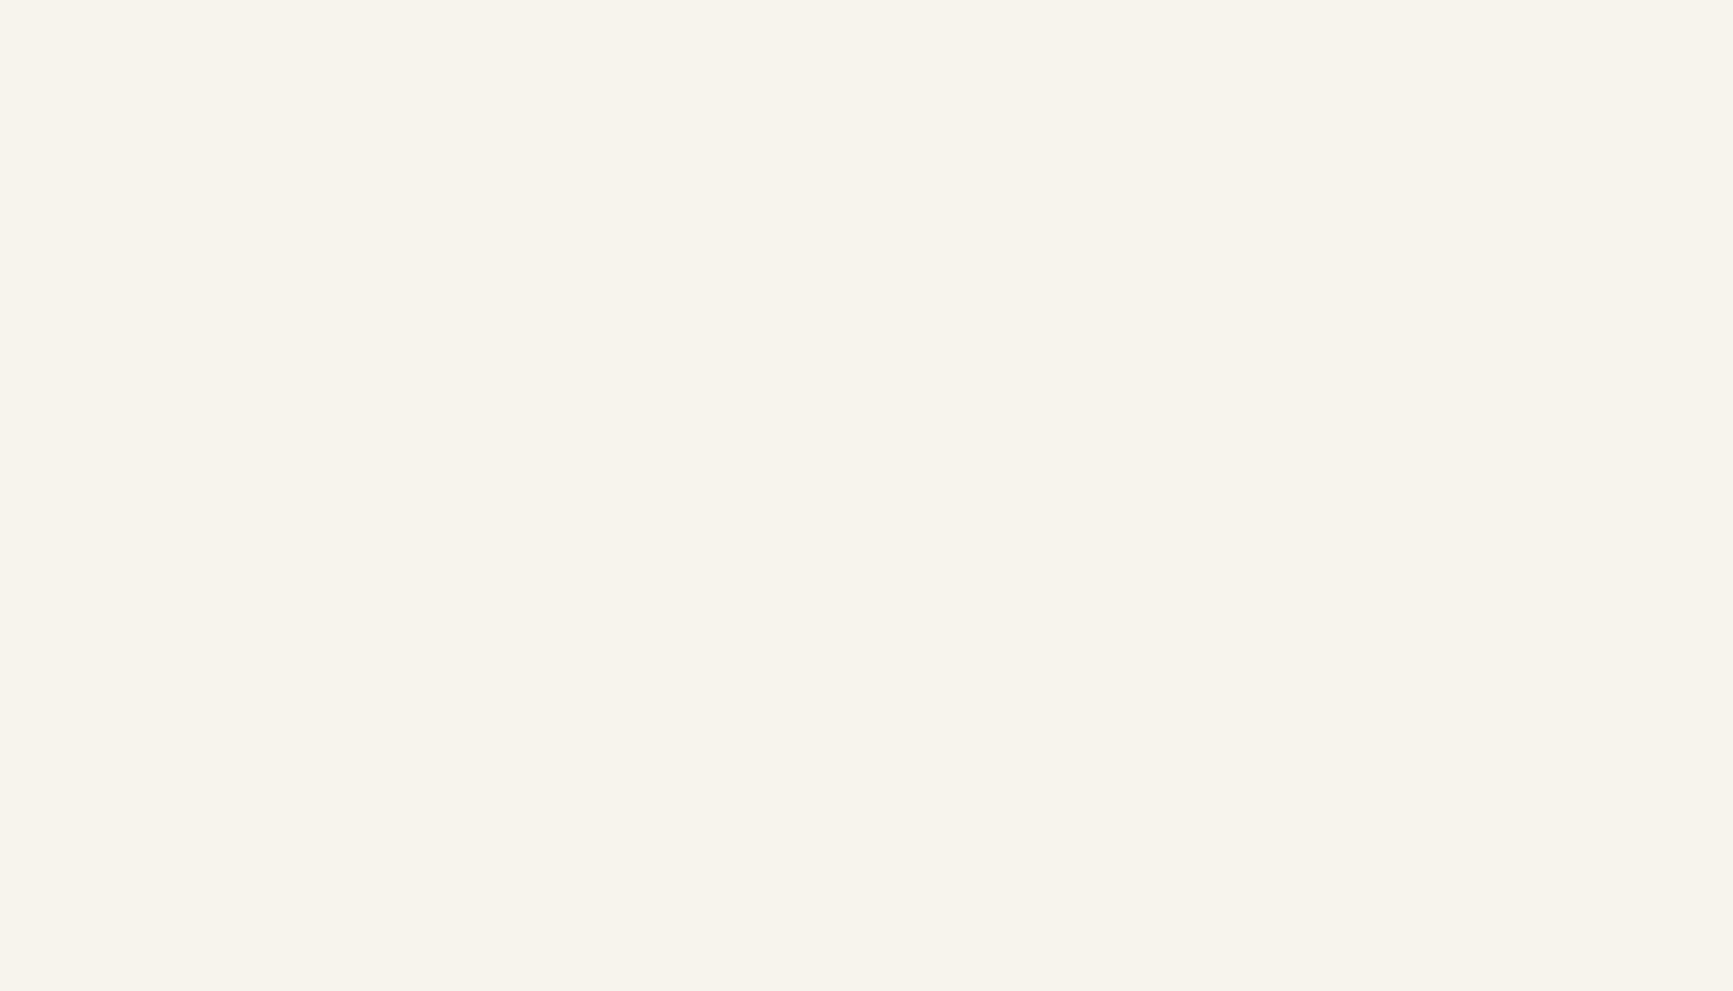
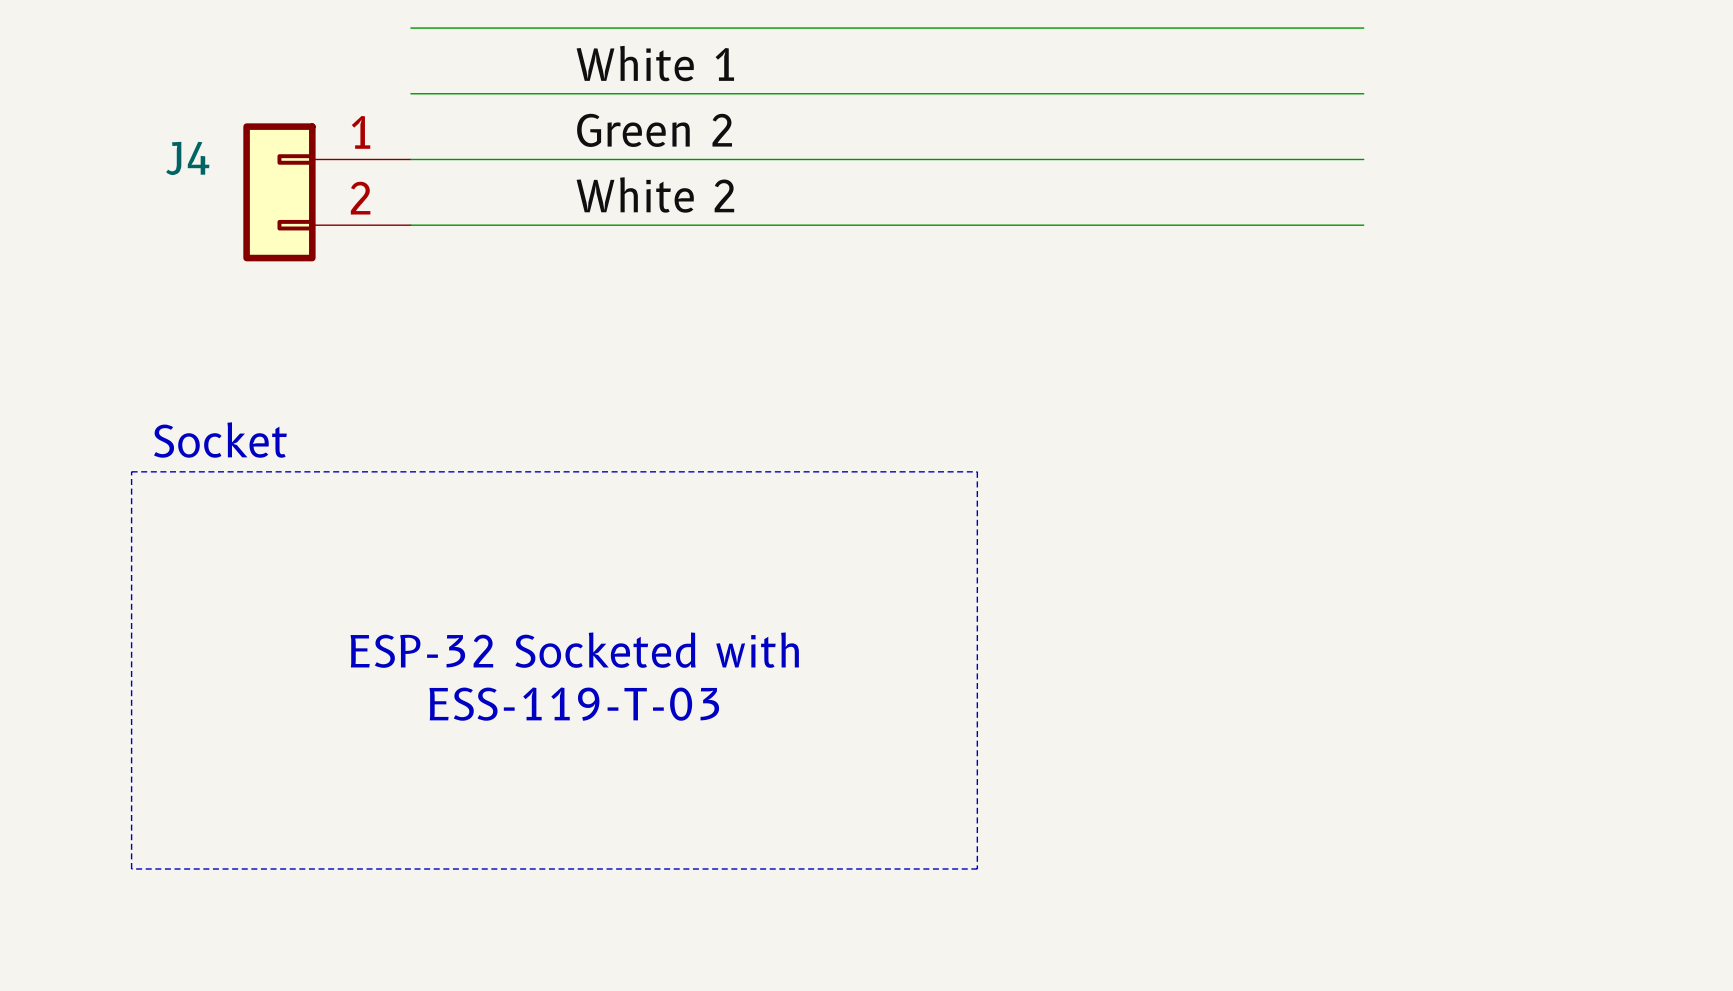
wire: none -> (410, 28) (1363, 28)
label: none -> White 1 (655, 63)
wire: none -> (410, 93) (1363, 93)
label: none -> Green 2 (654, 130)
wire: none -> (410, 159) (1363, 159)
J4: none -> (327, 192)
label: none -> White 2 (655, 194)
wire: none -> (410, 225) (1363, 225)
text: none -> Socket (220, 440)
line: none -> (131, 471) (977, 471) (977, 869) (131, 869) (131, 471)
text: none -> ESP-32 Socketed with (574, 650)
text: none -> ESS-119-T-03 (574, 704)

